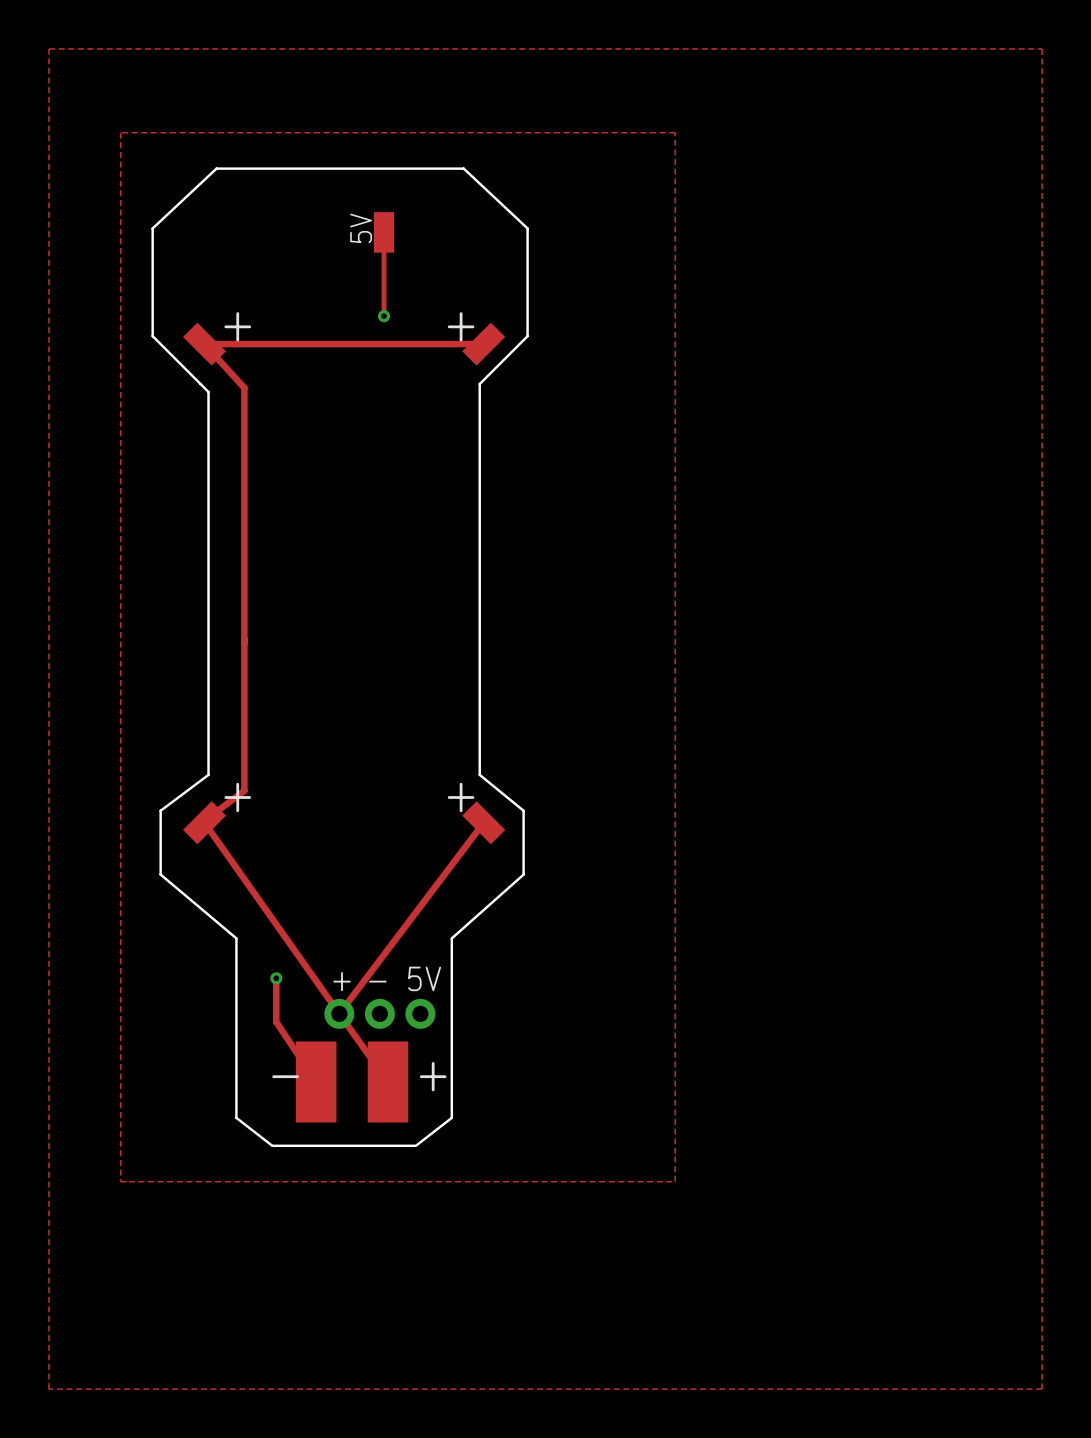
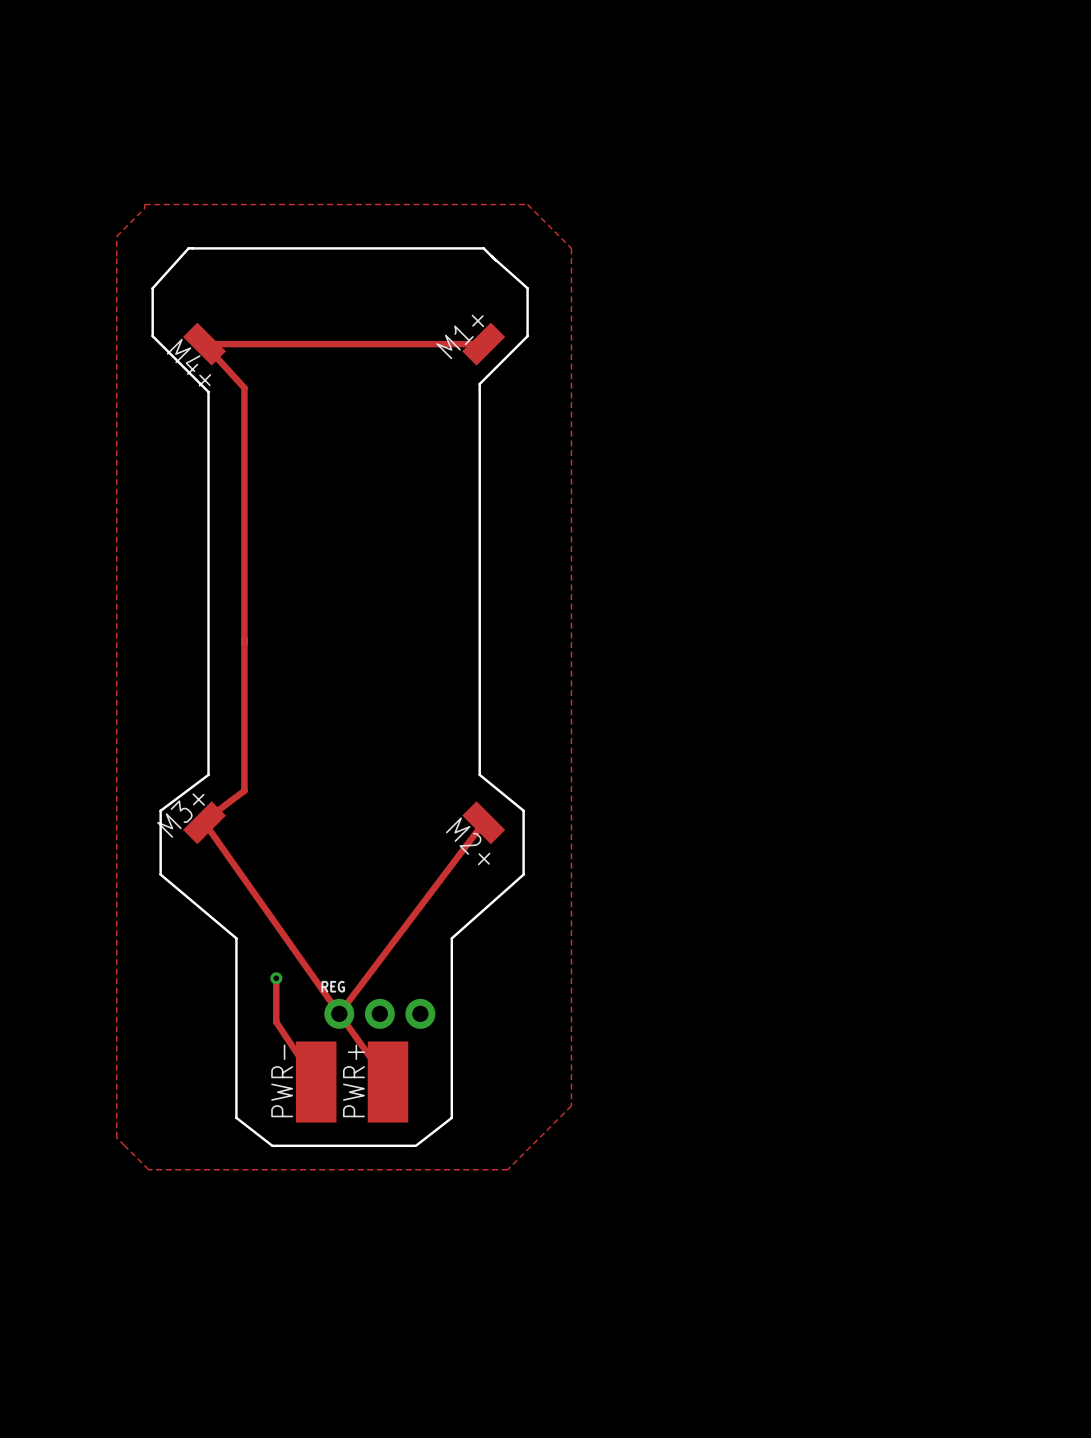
zone outline: (48, 48) (1042, 48) (1042, 1389) (48, 1389) (48, 48) -> none
zone outline: (120, 132) (675, 132) (675, 1181) (120, 1181) (120, 132) -> (144, 204) (144, 208) (116, 236) (116, 1137) (148, 1169) (507, 1169) (571, 1105) (571, 248) (527, 204) (144, 204)
track: (384, 232) (384, 316) -> none
5V: (384, 232) -> none
board edge: none -> (491, 256) (527, 288)
board edge: (152, 288) (152, 228) (216, 168) (463, 168) (527, 228) (527, 288) -> (152, 288) (188, 248) (483, 248) (495, 260)
via: (384, 316) -> none
text: + (237, 326) -> none
text: + (461, 326) -> none
M1+ name: none -> M1+ (460, 336)
M4+ name: none -> M4+ (189, 362)
text: + (237, 797) -> none
text: + (461, 797) -> none
M3+ name: none -> M3+ (181, 815)
M2+ name: none -> M2+ (468, 841)
text: 5V (424, 978) -> none
text: + (342, 981) -> none
text: - (377, 981) -> none
REG name: none -> REG (333, 986)
text: - (285, 1076) -> none
text: + (433, 1076) -> none
PWR- name: none -> PWR- (282, 1080)
PWR+ name: none -> PWR+ (353, 1080)

